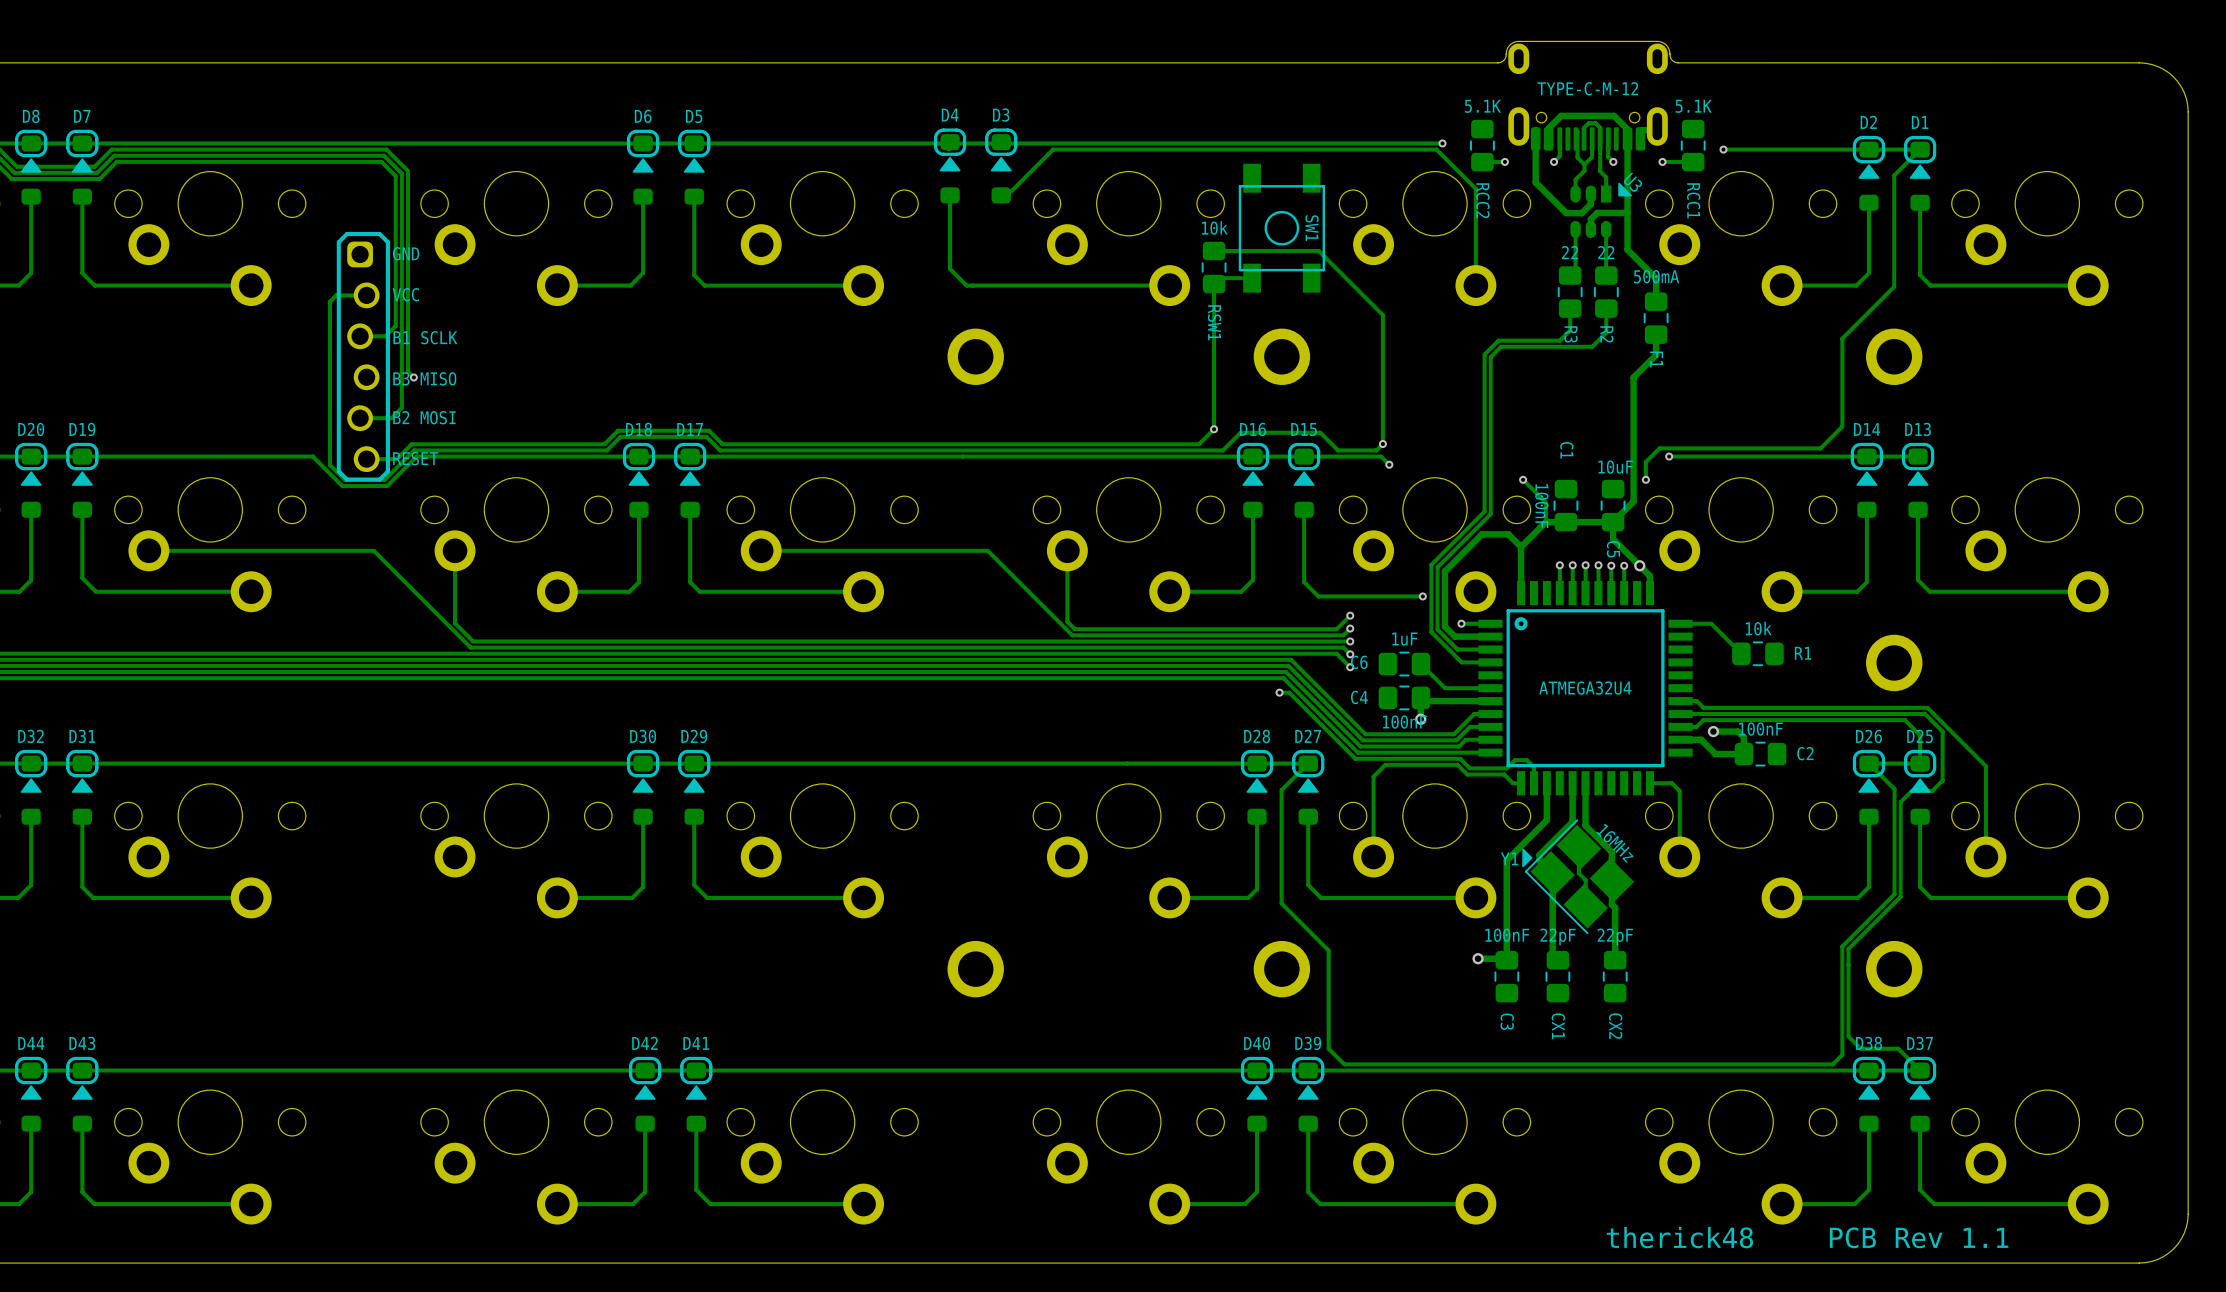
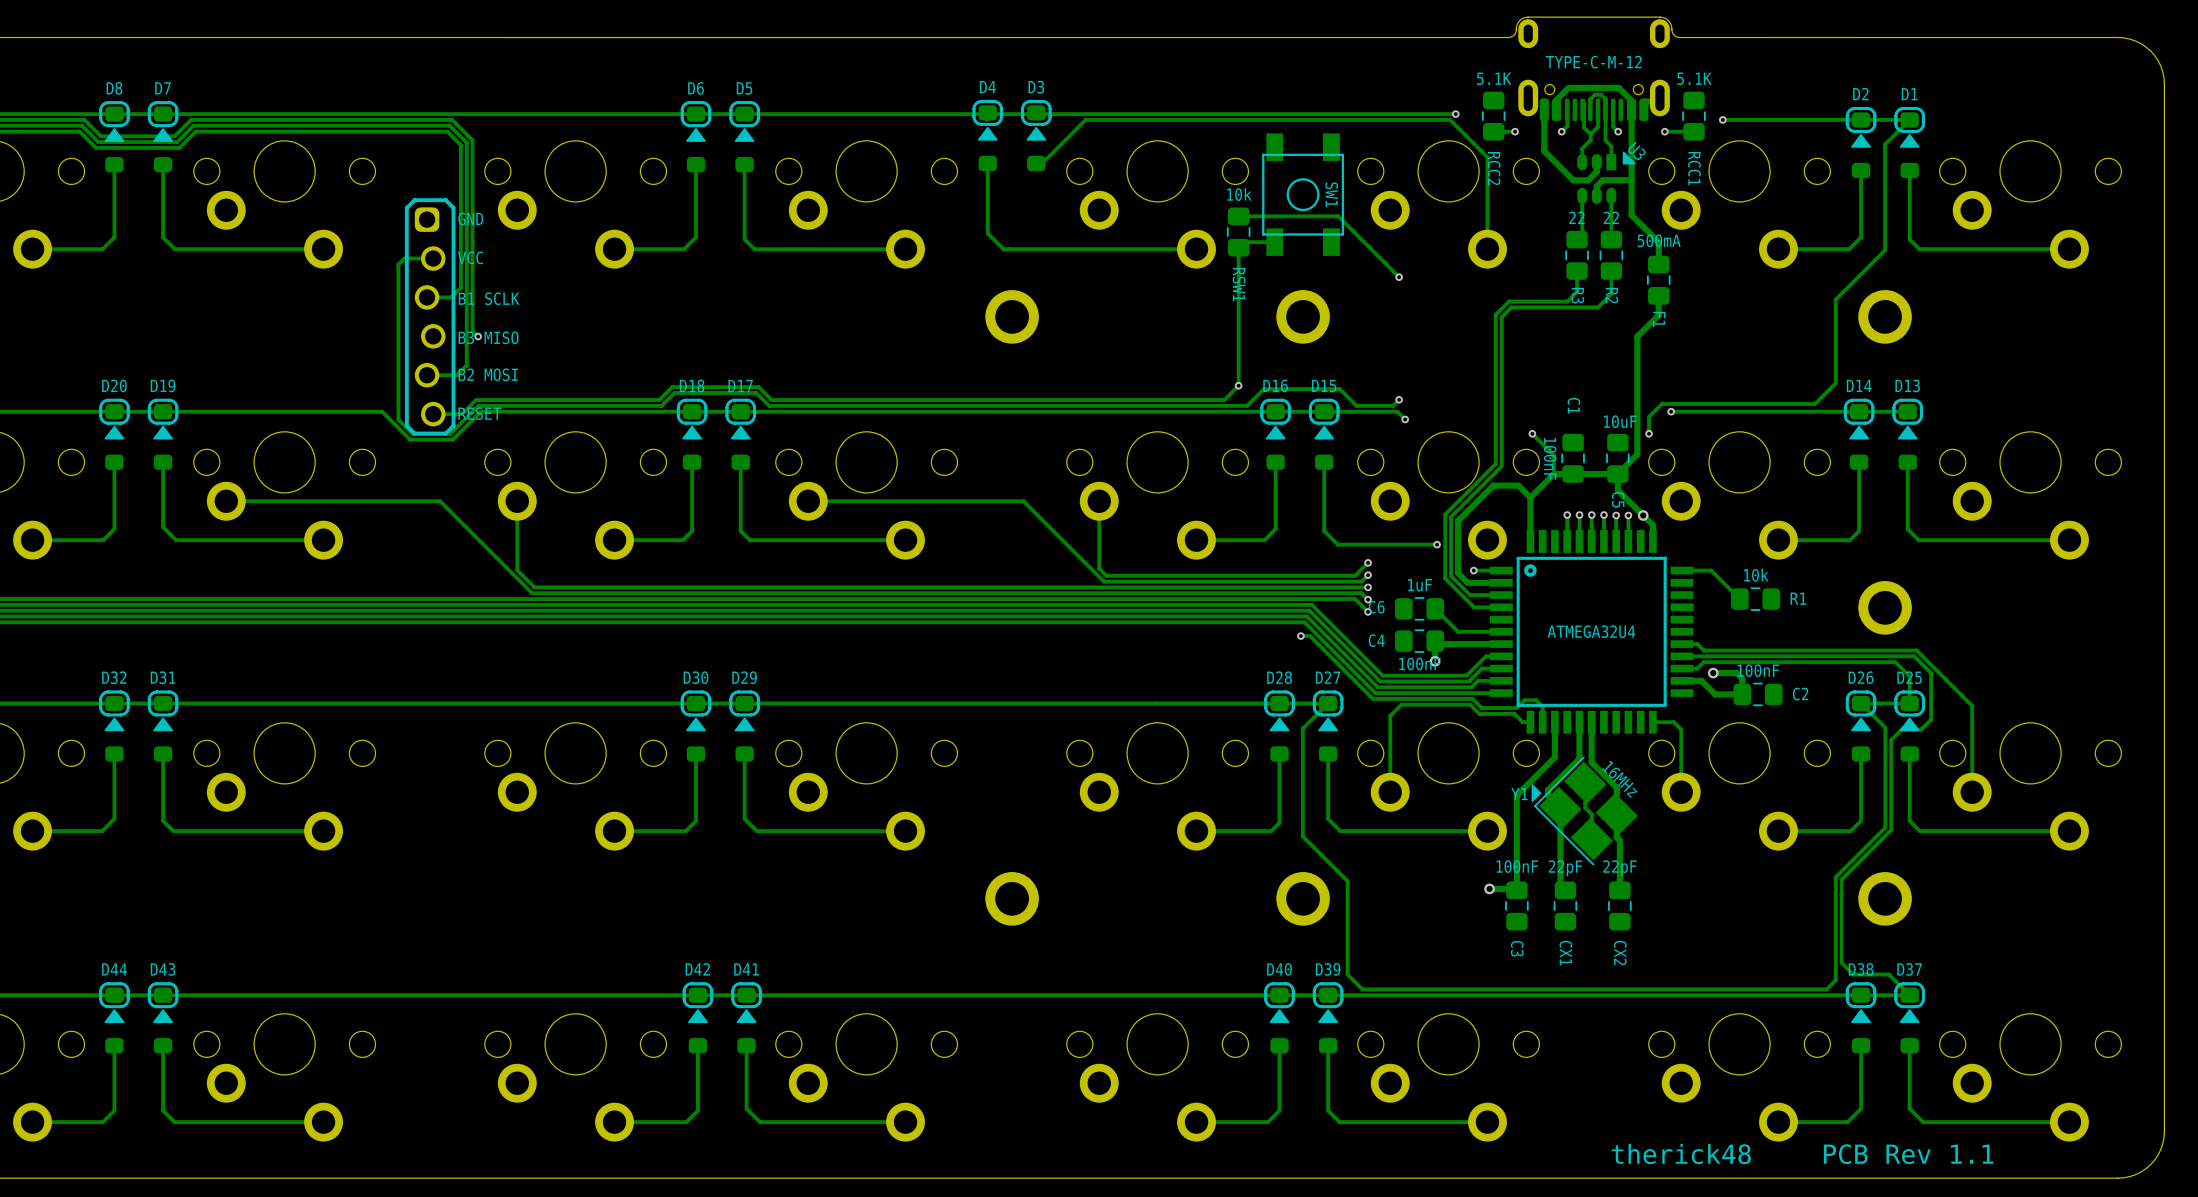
track: (1382, 315) (1382, 444) -> none
via: none -> (1399, 277)

